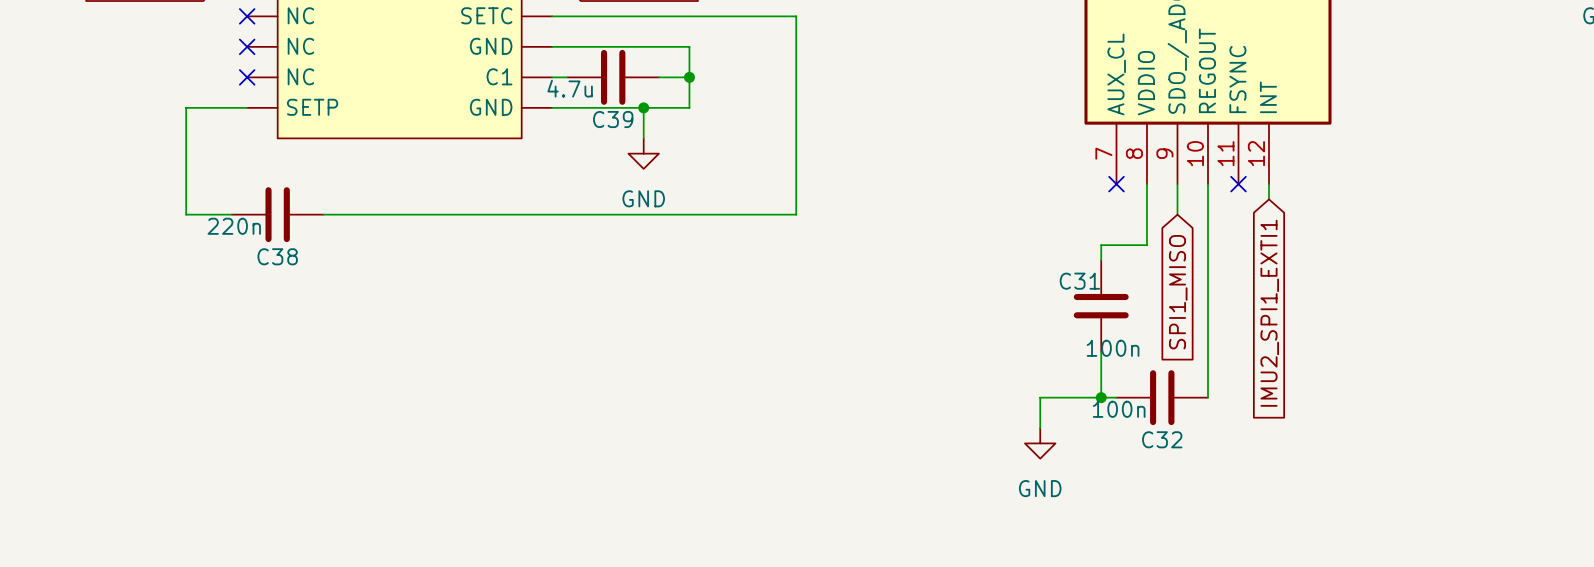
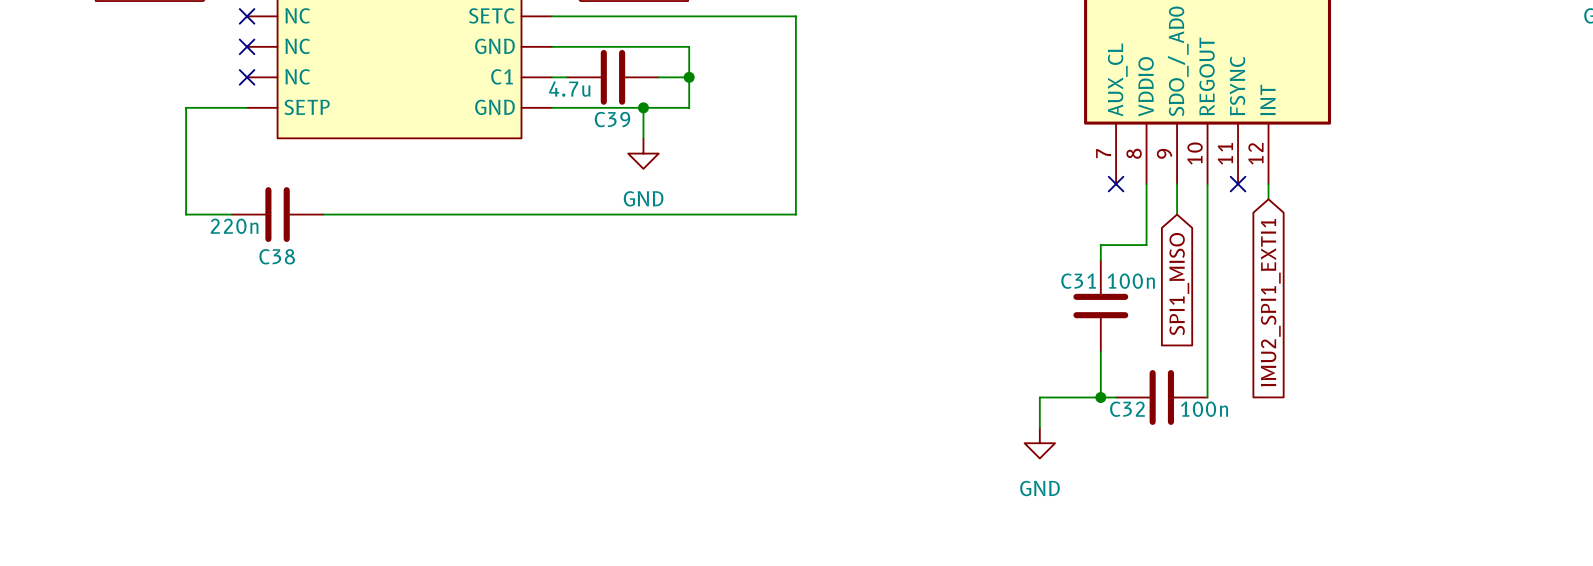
C31 value position: 100n (1113, 348) -> 100n (1131, 281)
C32 value position: 100n (1119, 409) -> 100n (1204, 409)
C32 name position: C32 (1162, 439) -> C32 (1127, 409)

